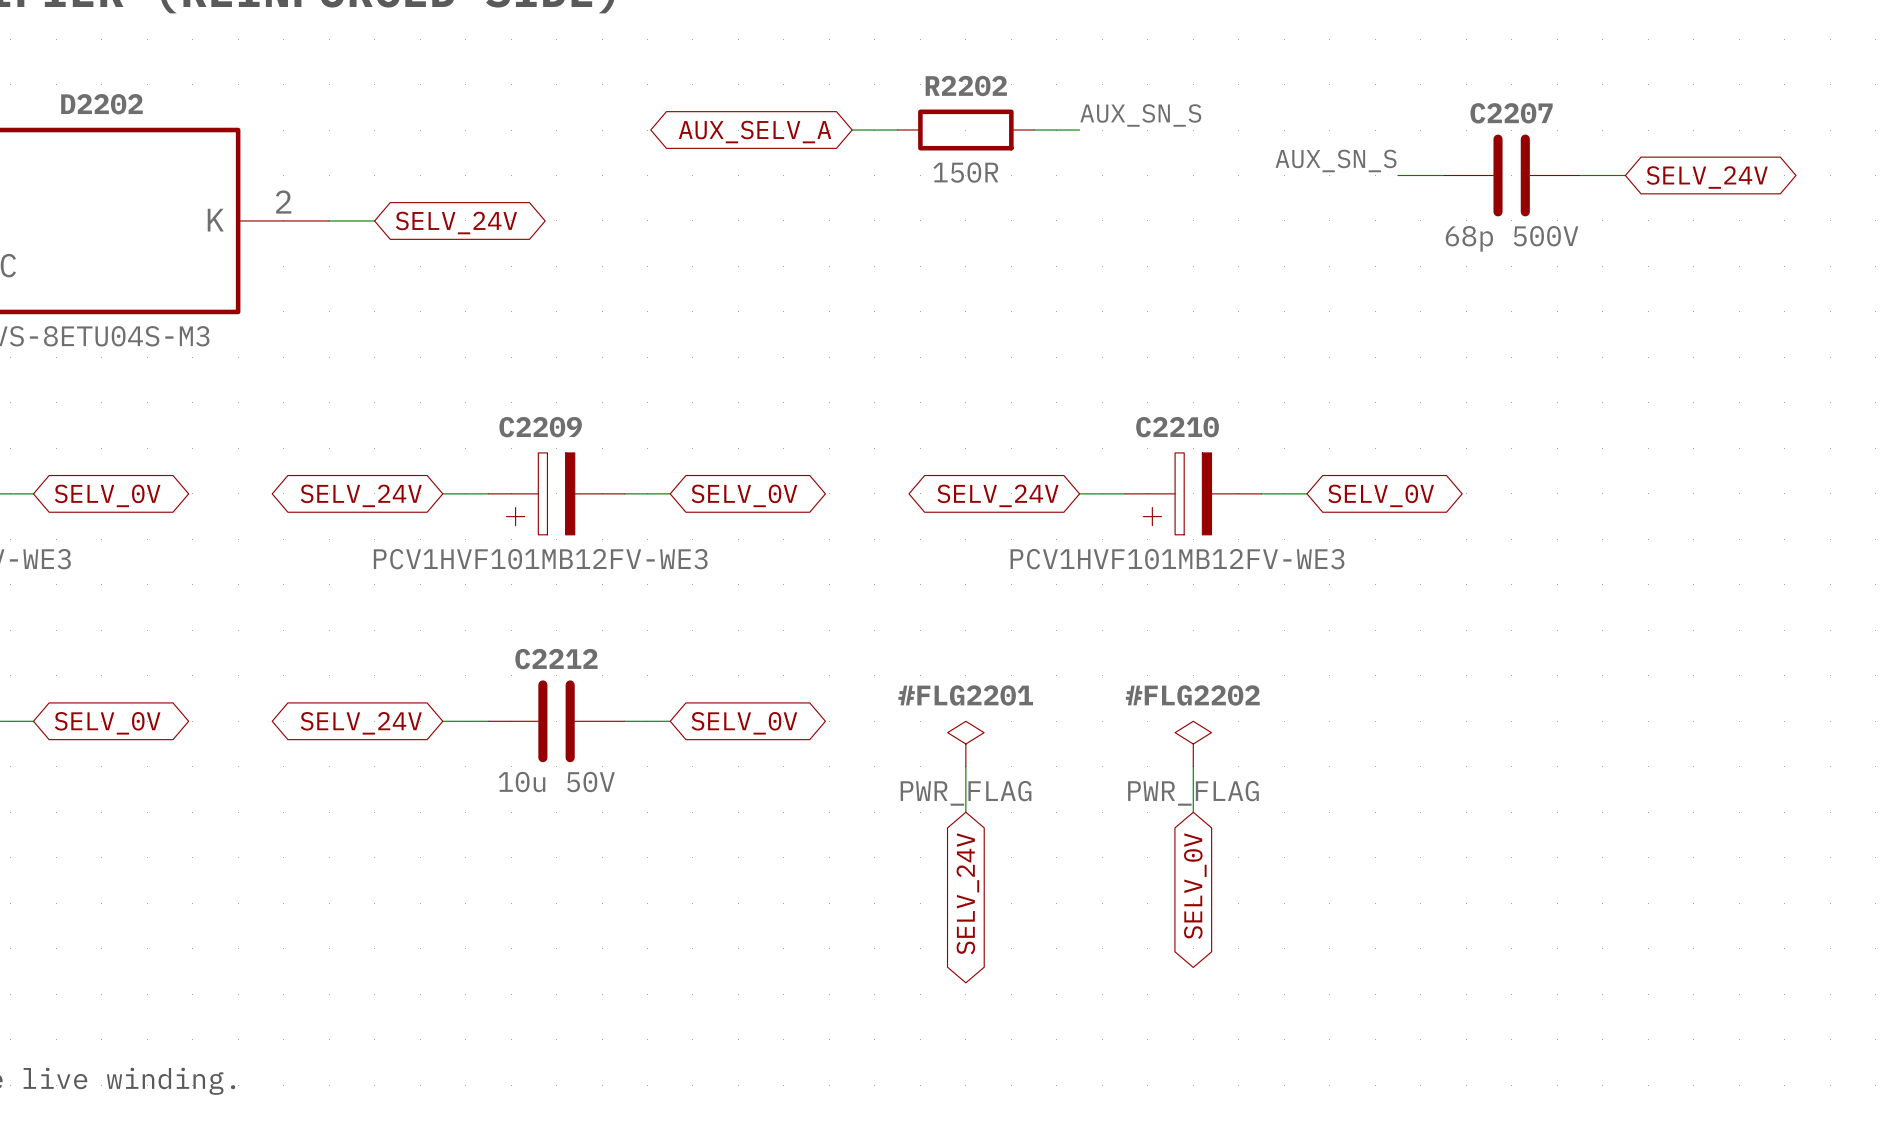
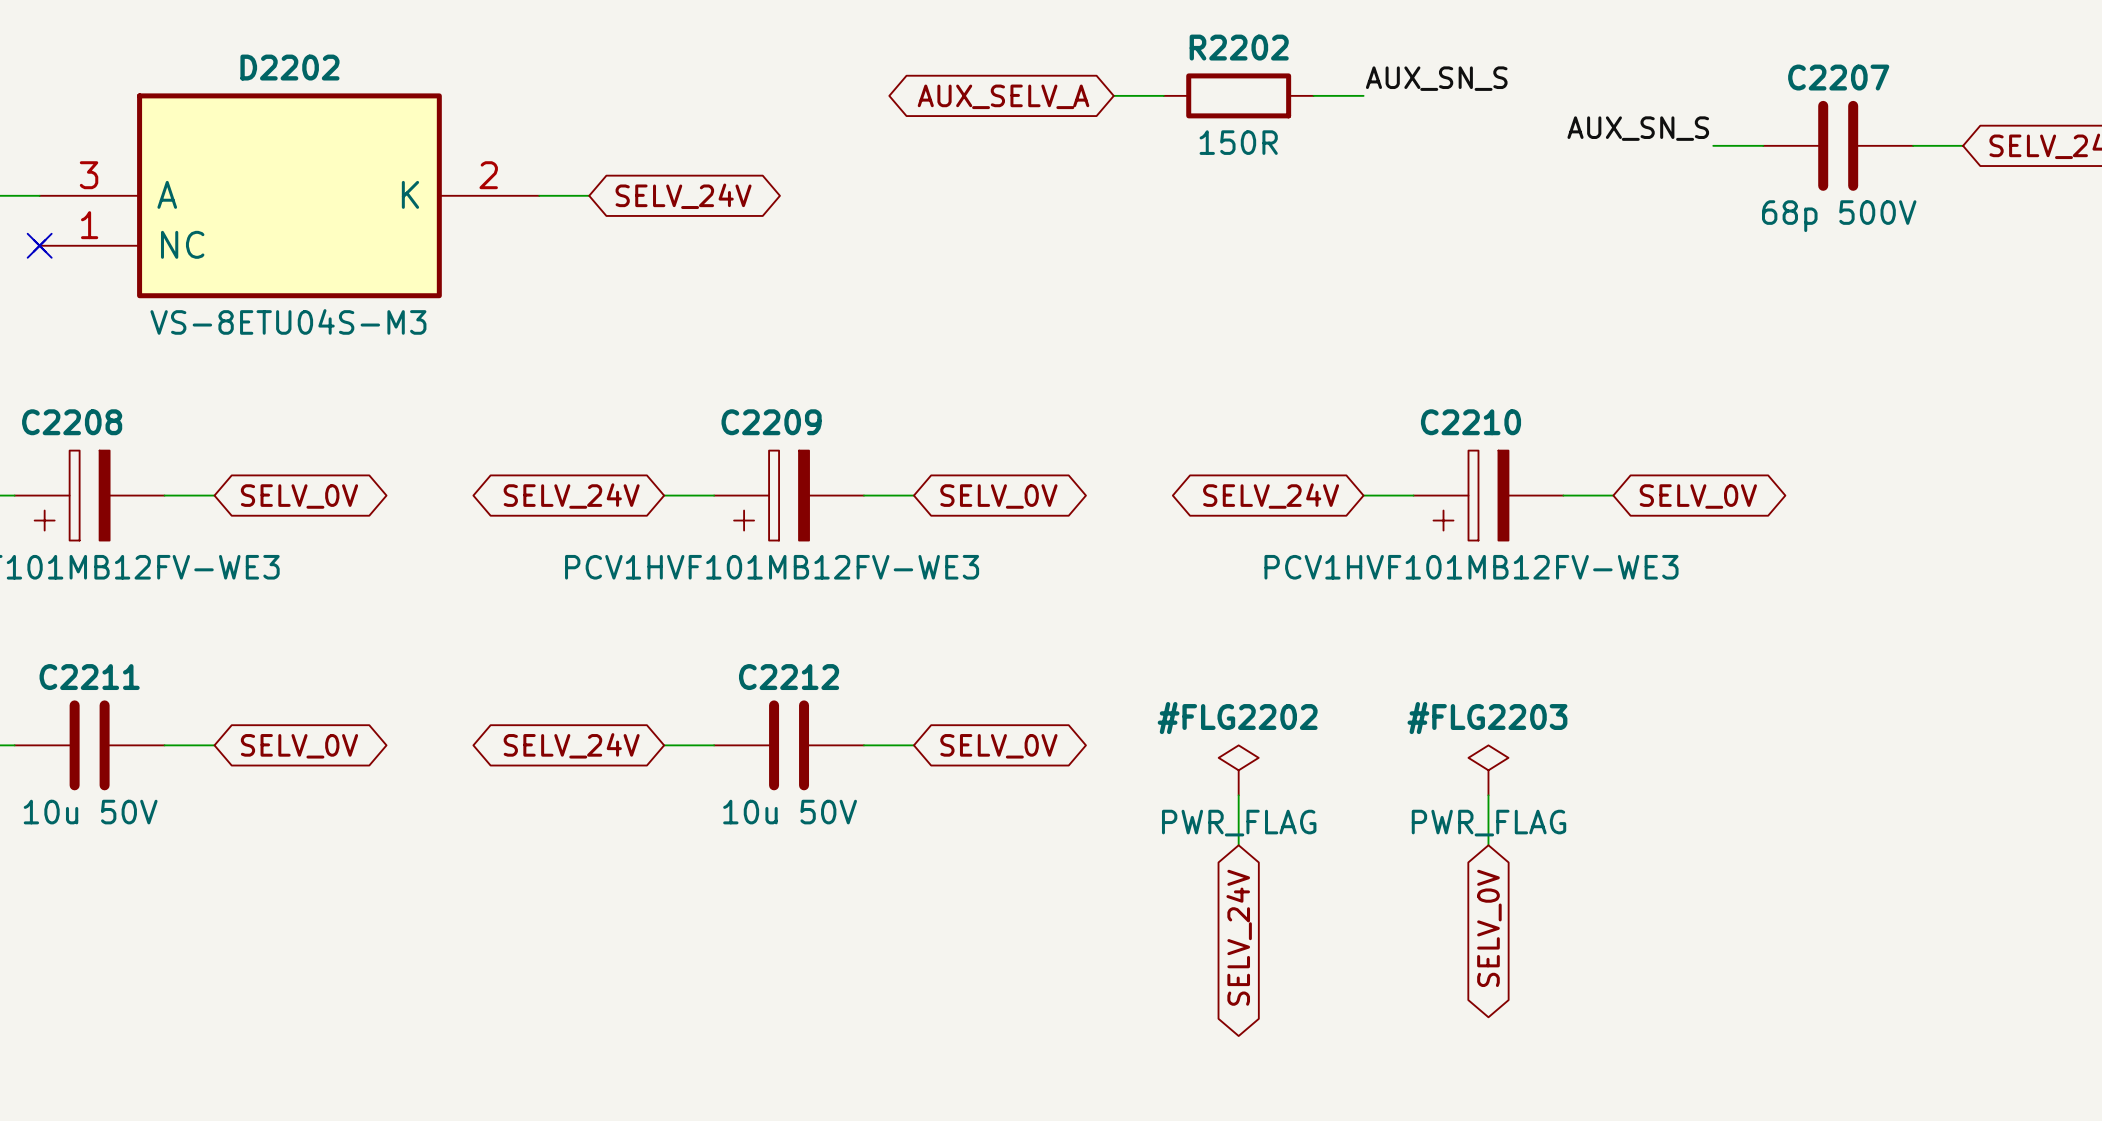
#FLG2201 name: #FLG2201 (965, 695) -> #FLG2202 (1237, 718)
#FLG2202 name: #FLG2202 (1192, 695) -> #FLG2203 (1487, 718)

